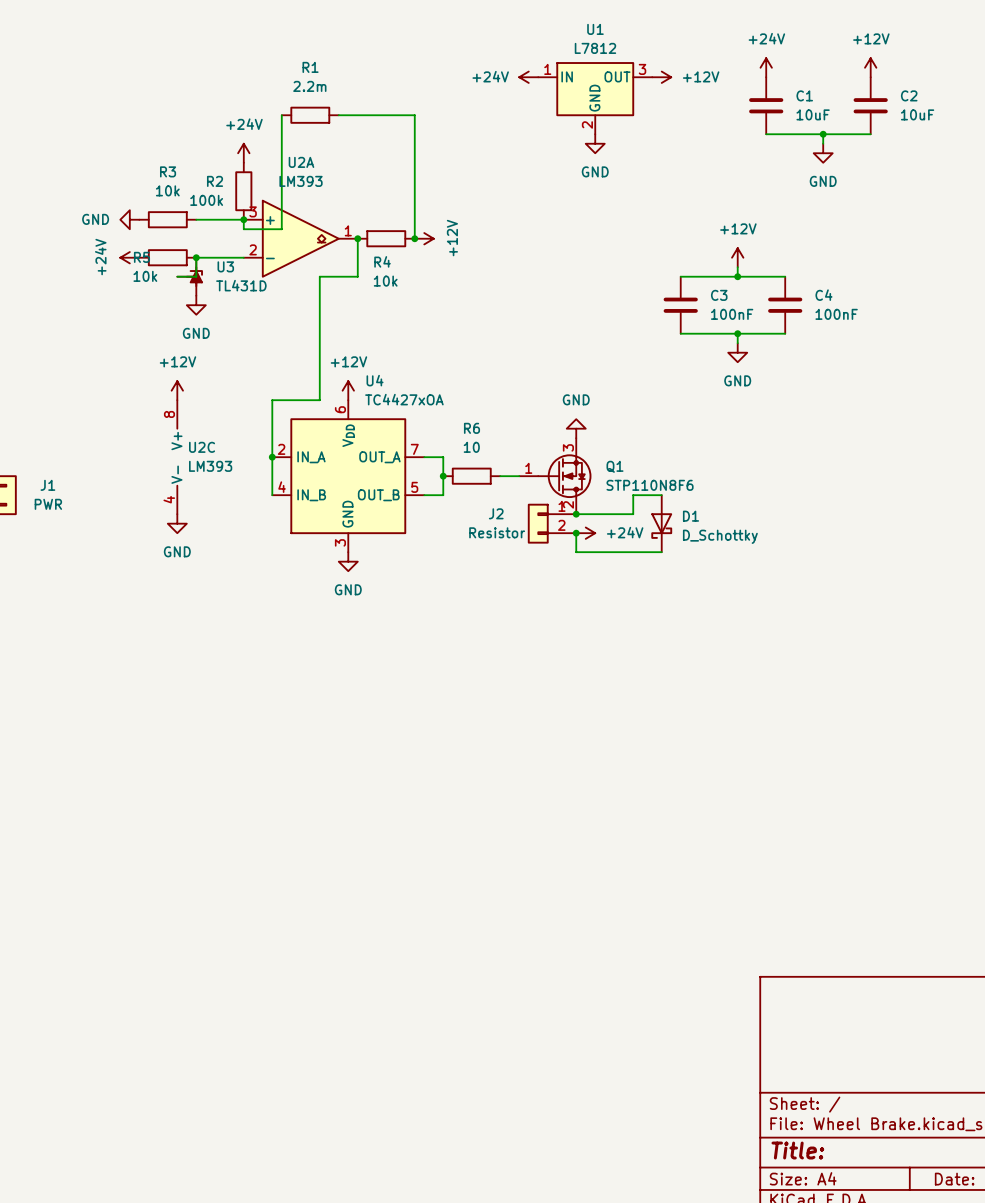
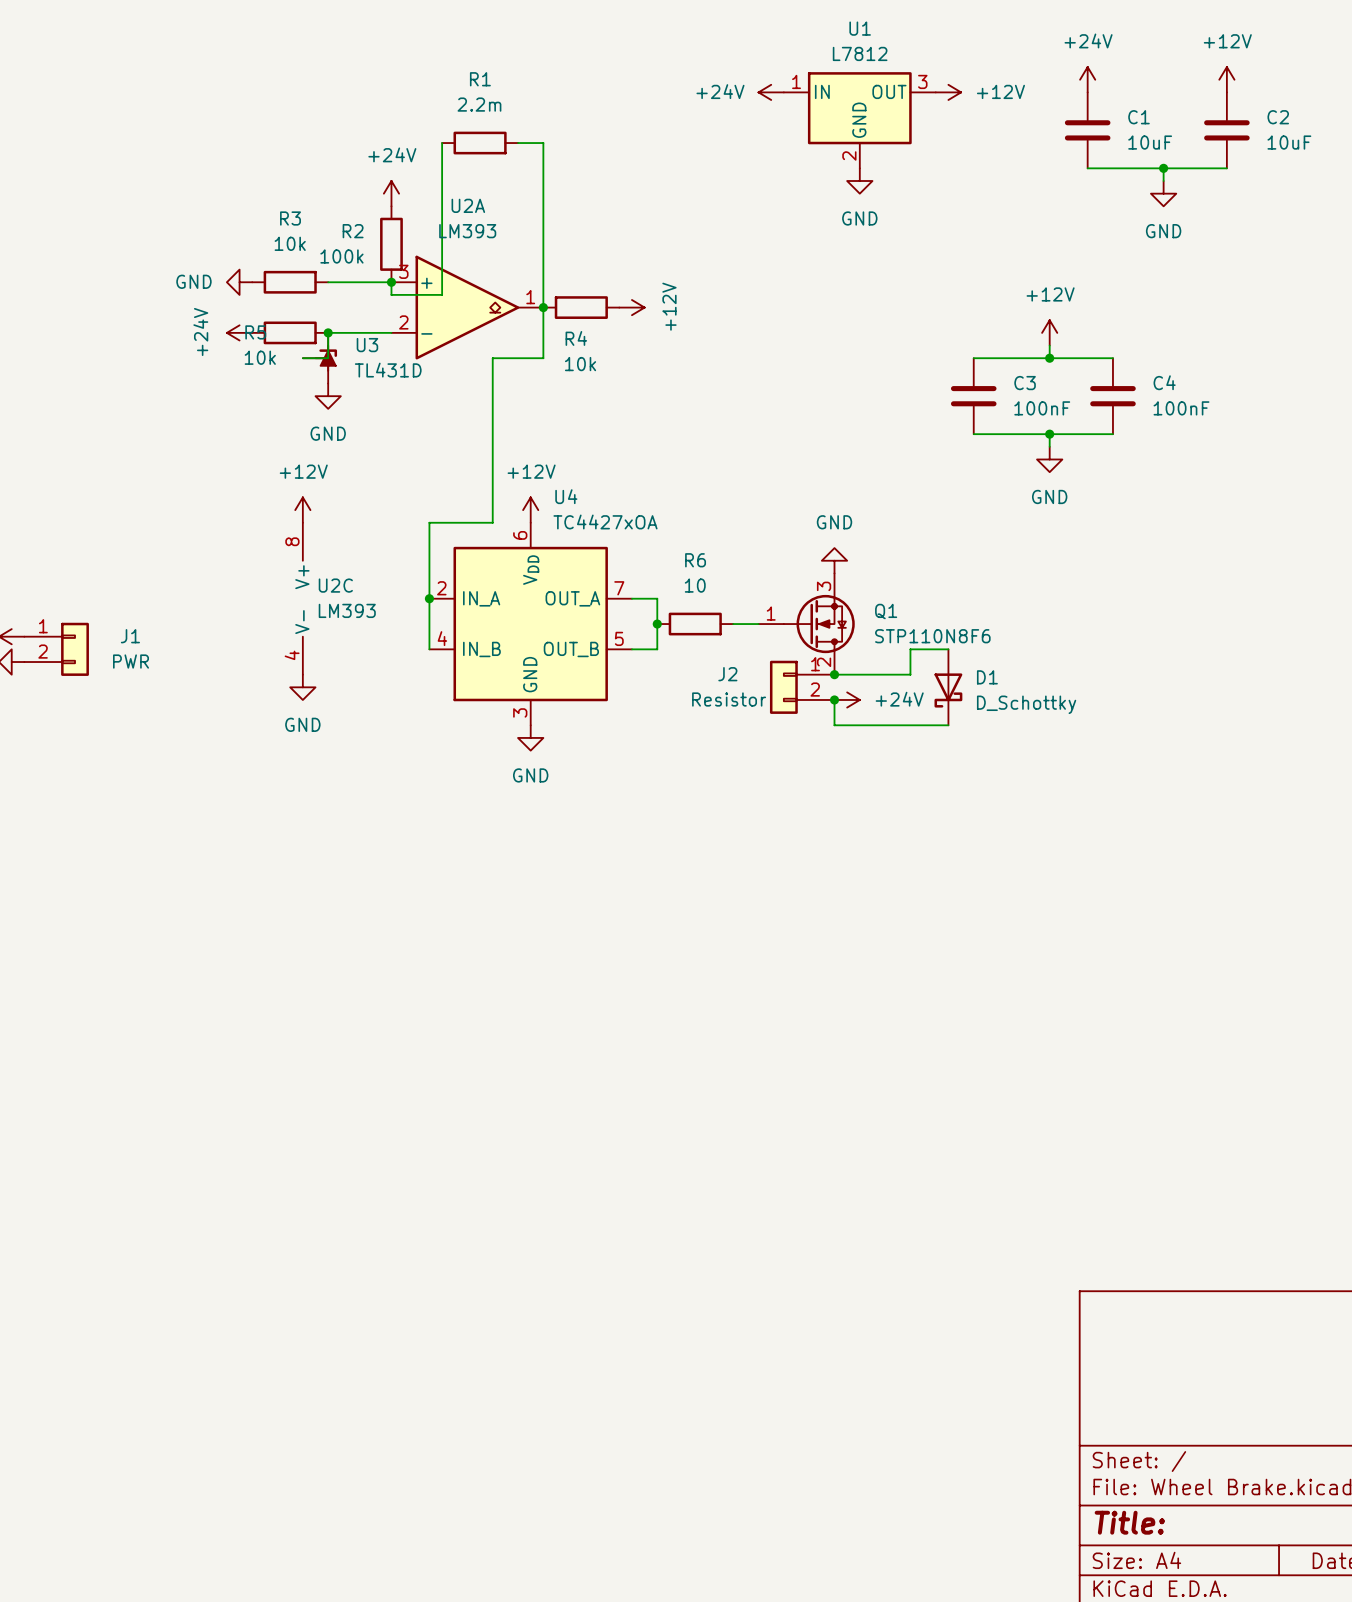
wire: (357, 115) (414, 115) (414, 238) -> (543, 143) (543, 307)
junction: (414, 238) -> none

